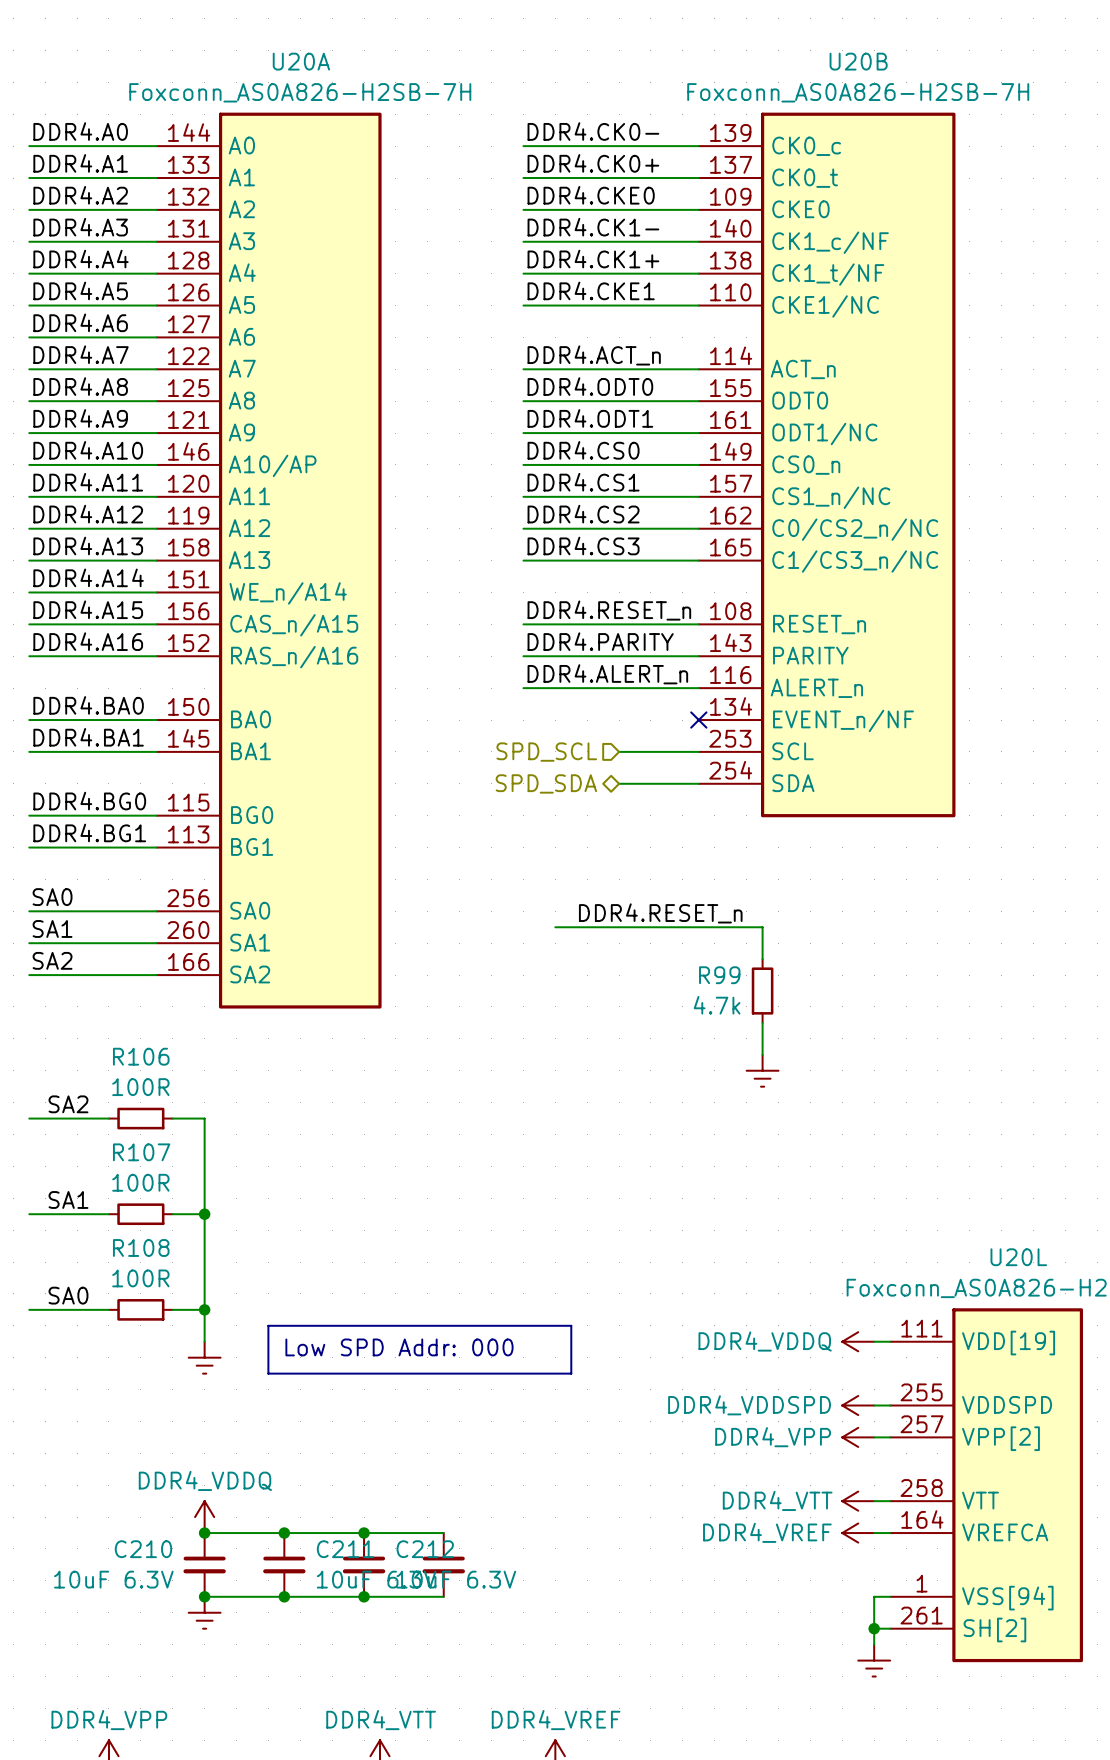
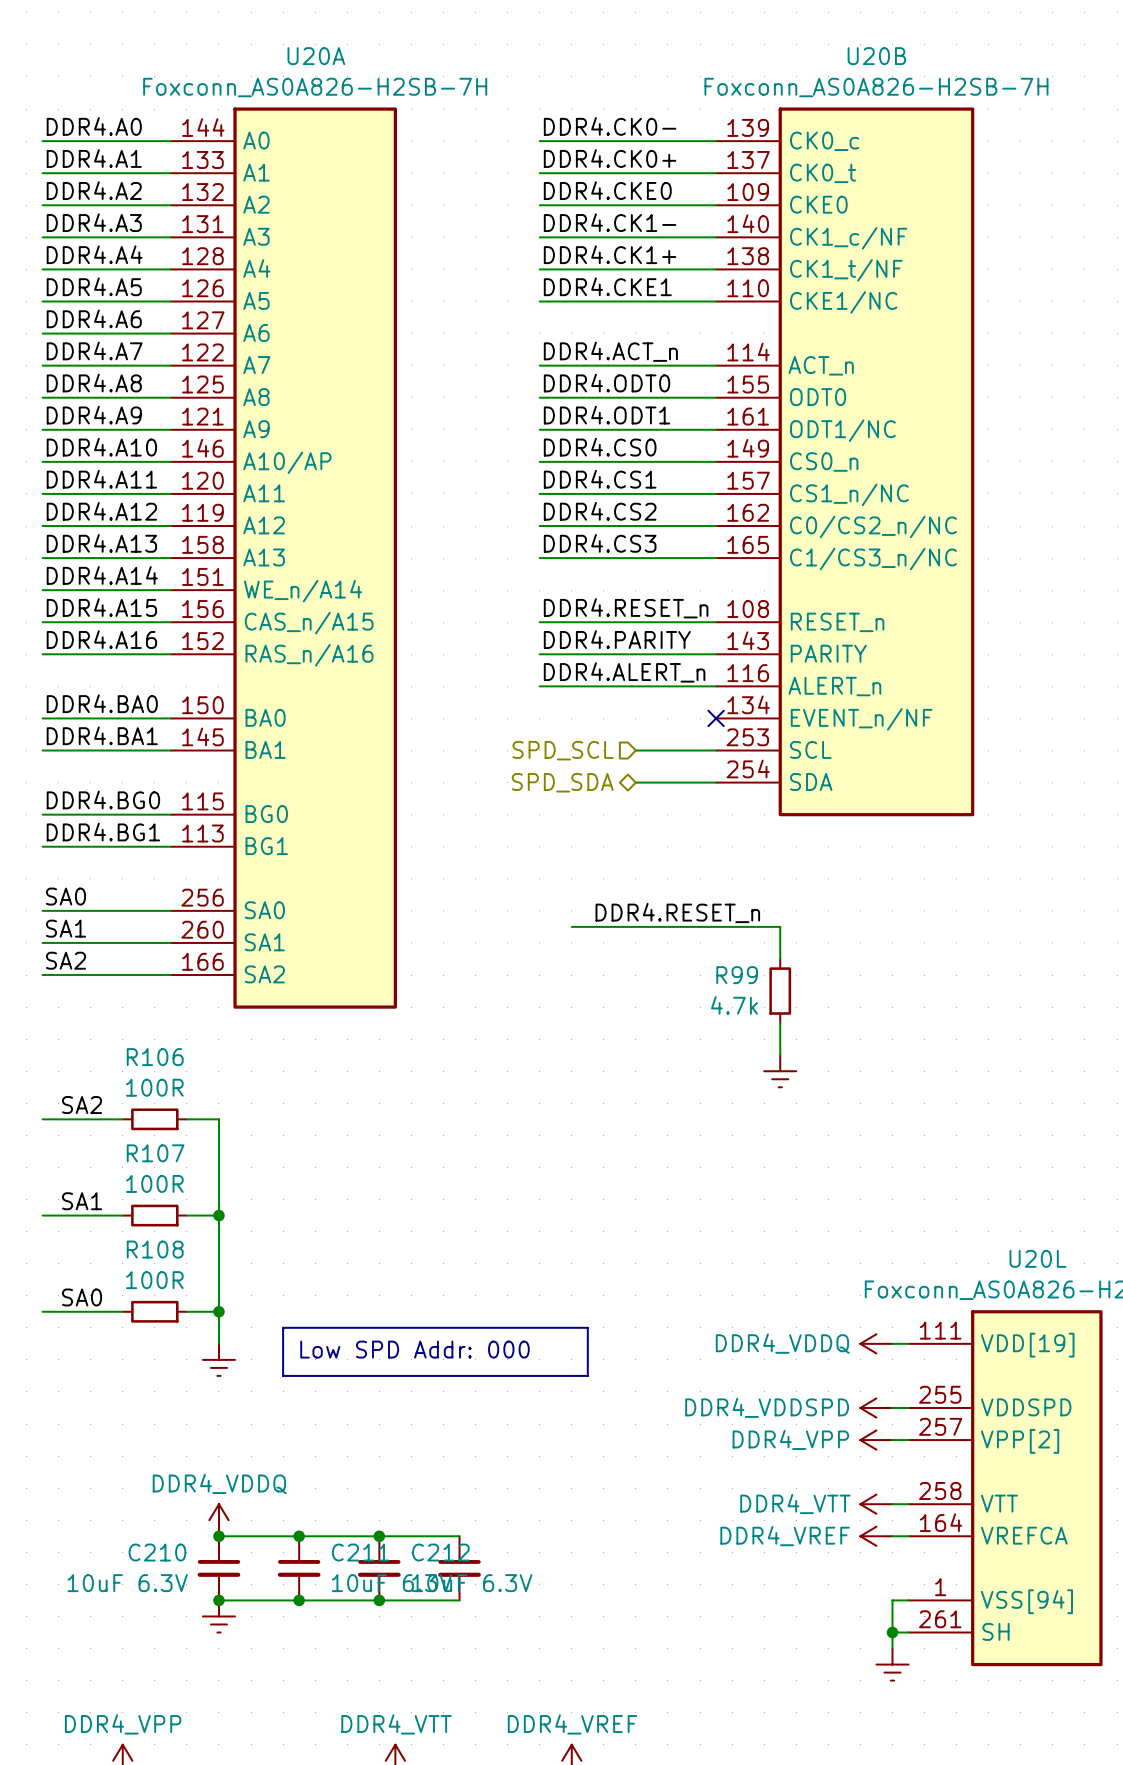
U20L pin name: SH[2] (994, 1629) -> SH (996, 1631)

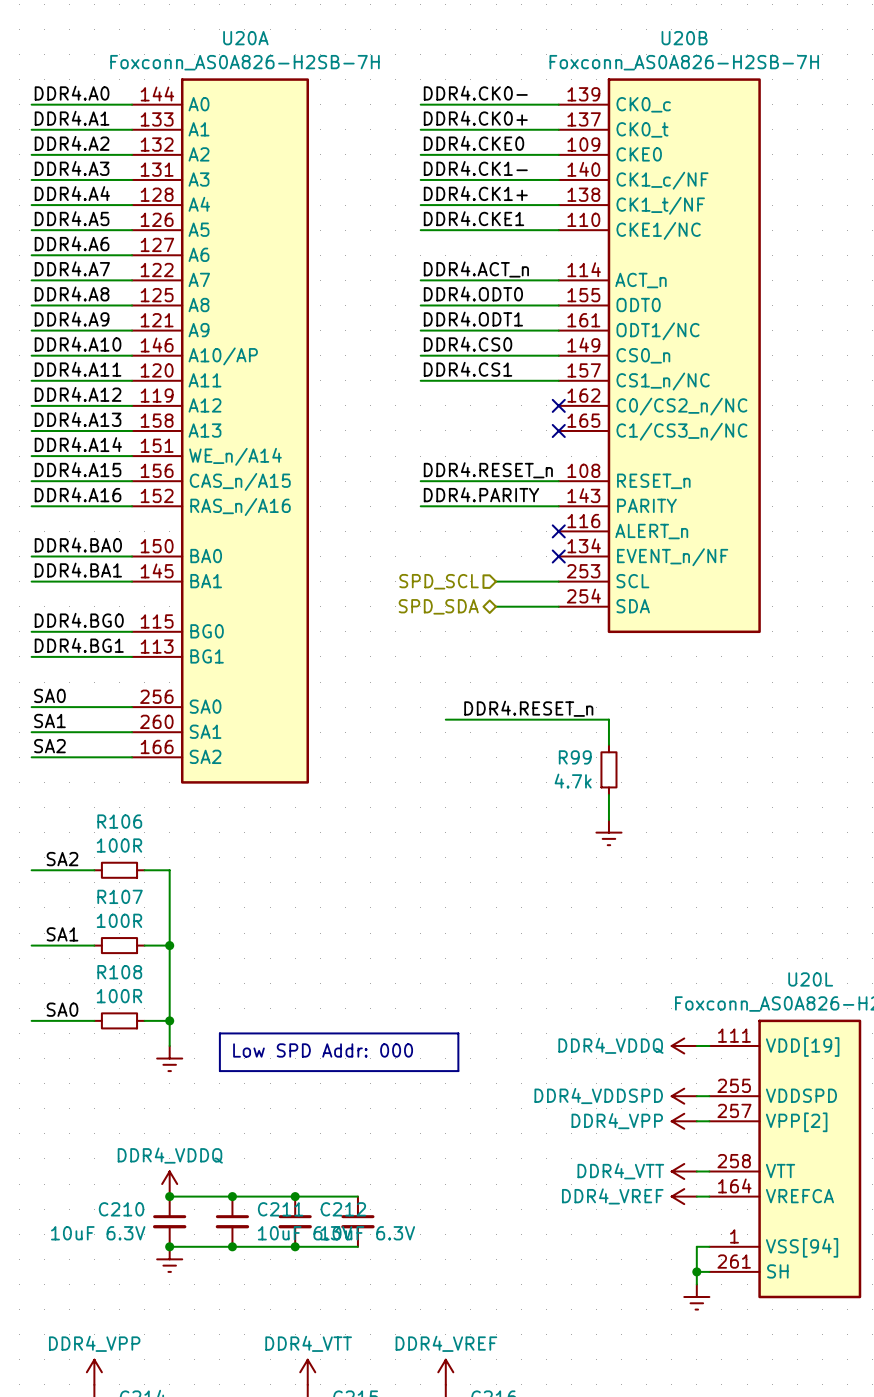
label: DDR4.CS2 (600, 511) -> none
wire: (539, 526) (716, 526) -> none
no-connect mark: none -> (558, 405)
label: DDR4.CS3 (600, 543) -> none
wire: (539, 558) (716, 558) -> none
no-connect mark: none -> (558, 430)
label: DDR4.ALERT_n (624, 672) -> none
wire: (539, 686) (716, 686) -> none
no-connect mark: none -> (558, 531)

